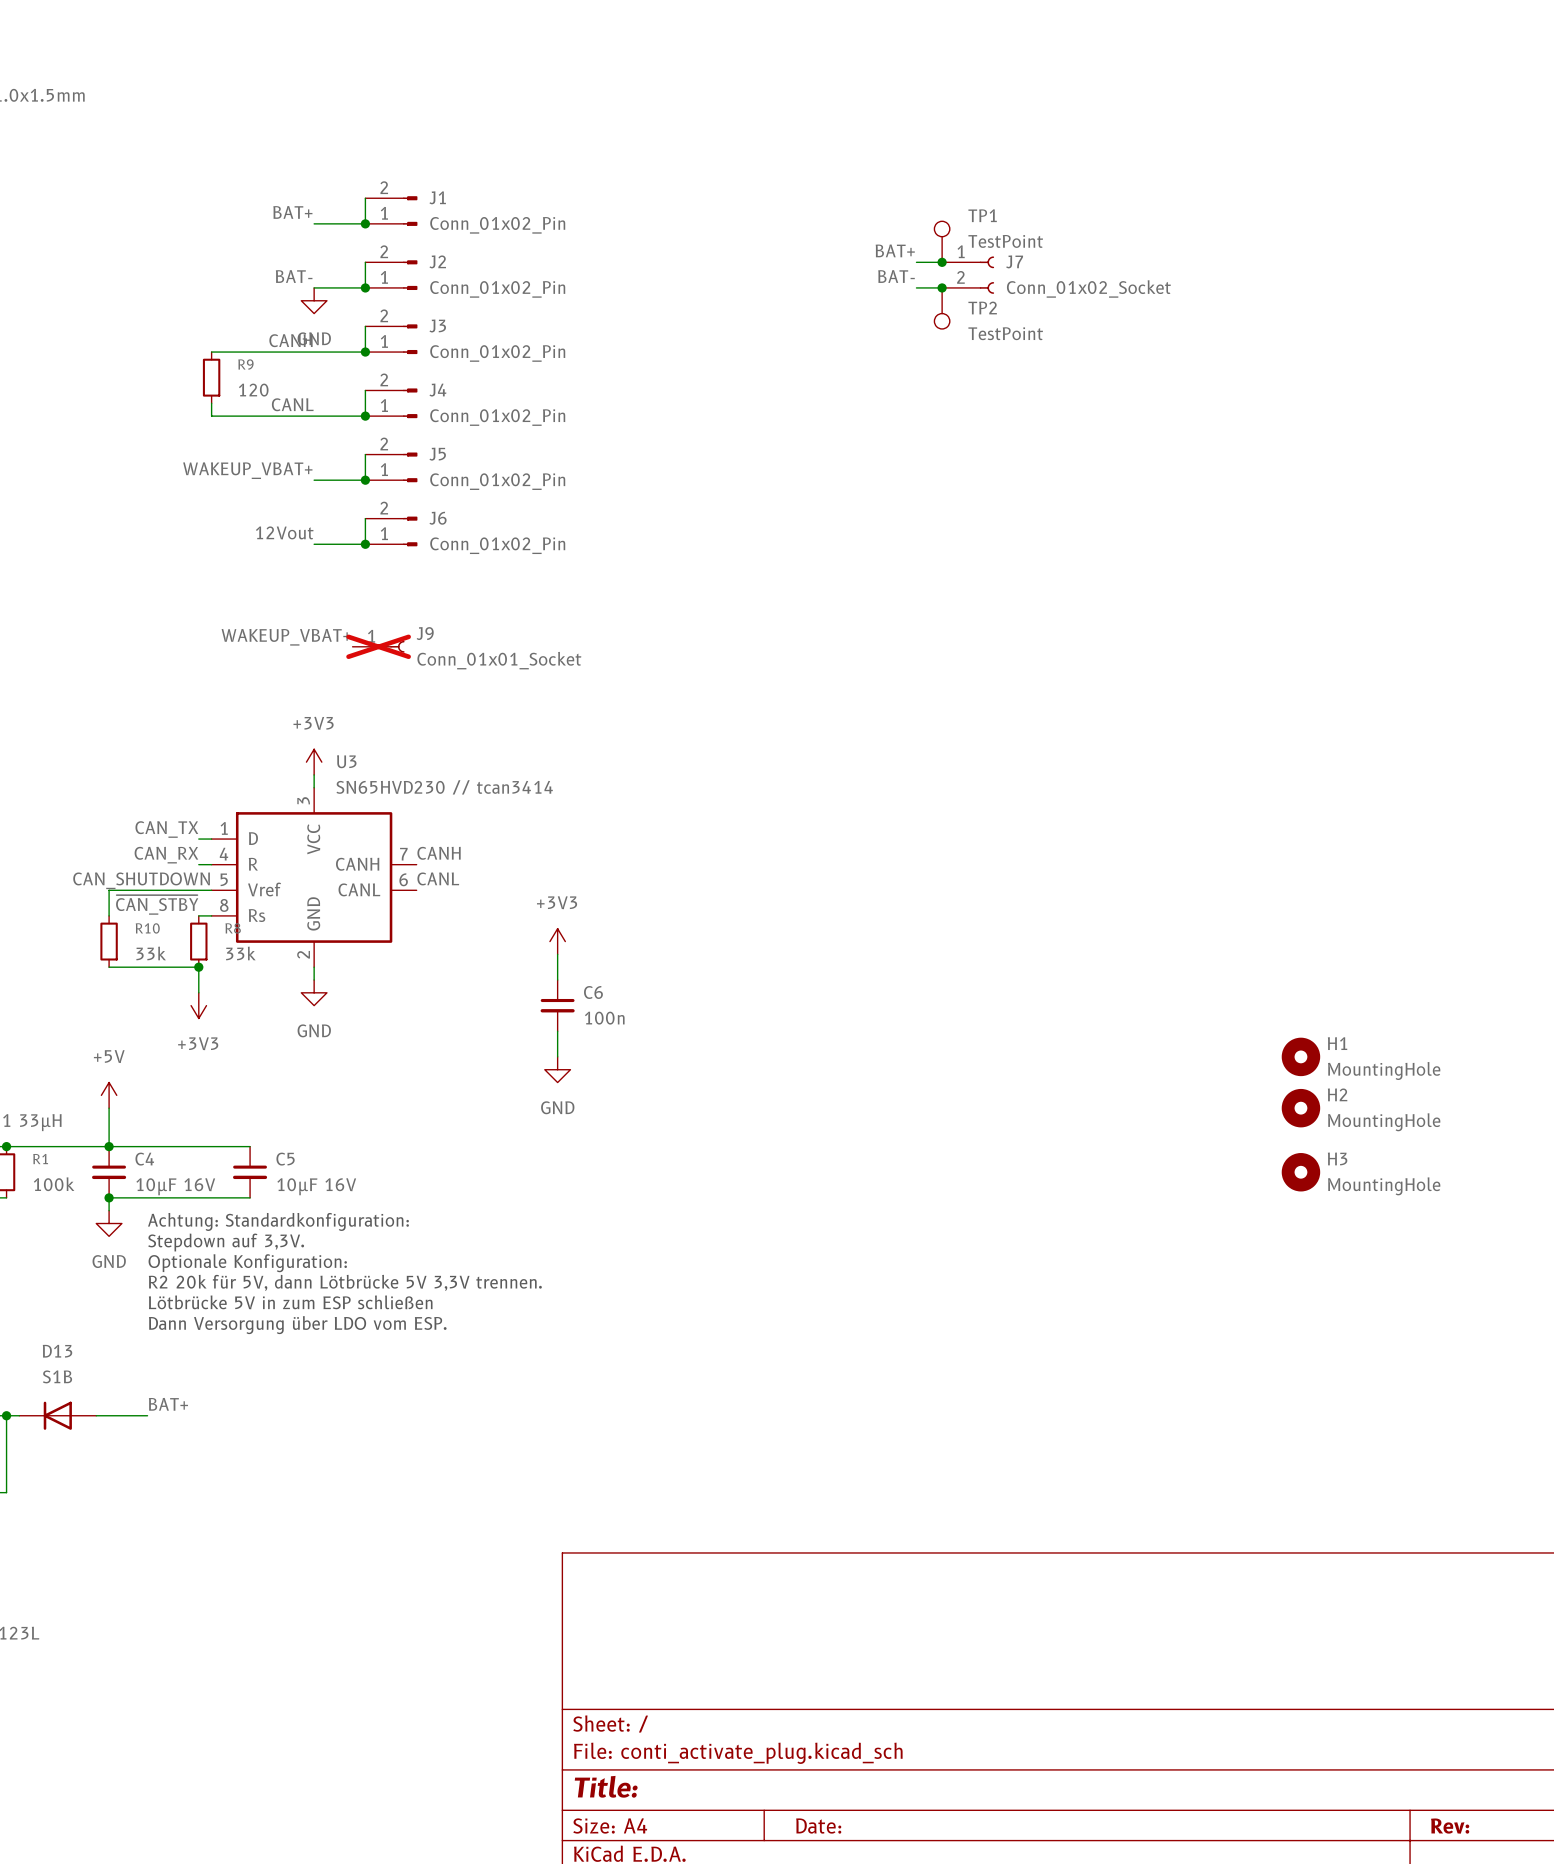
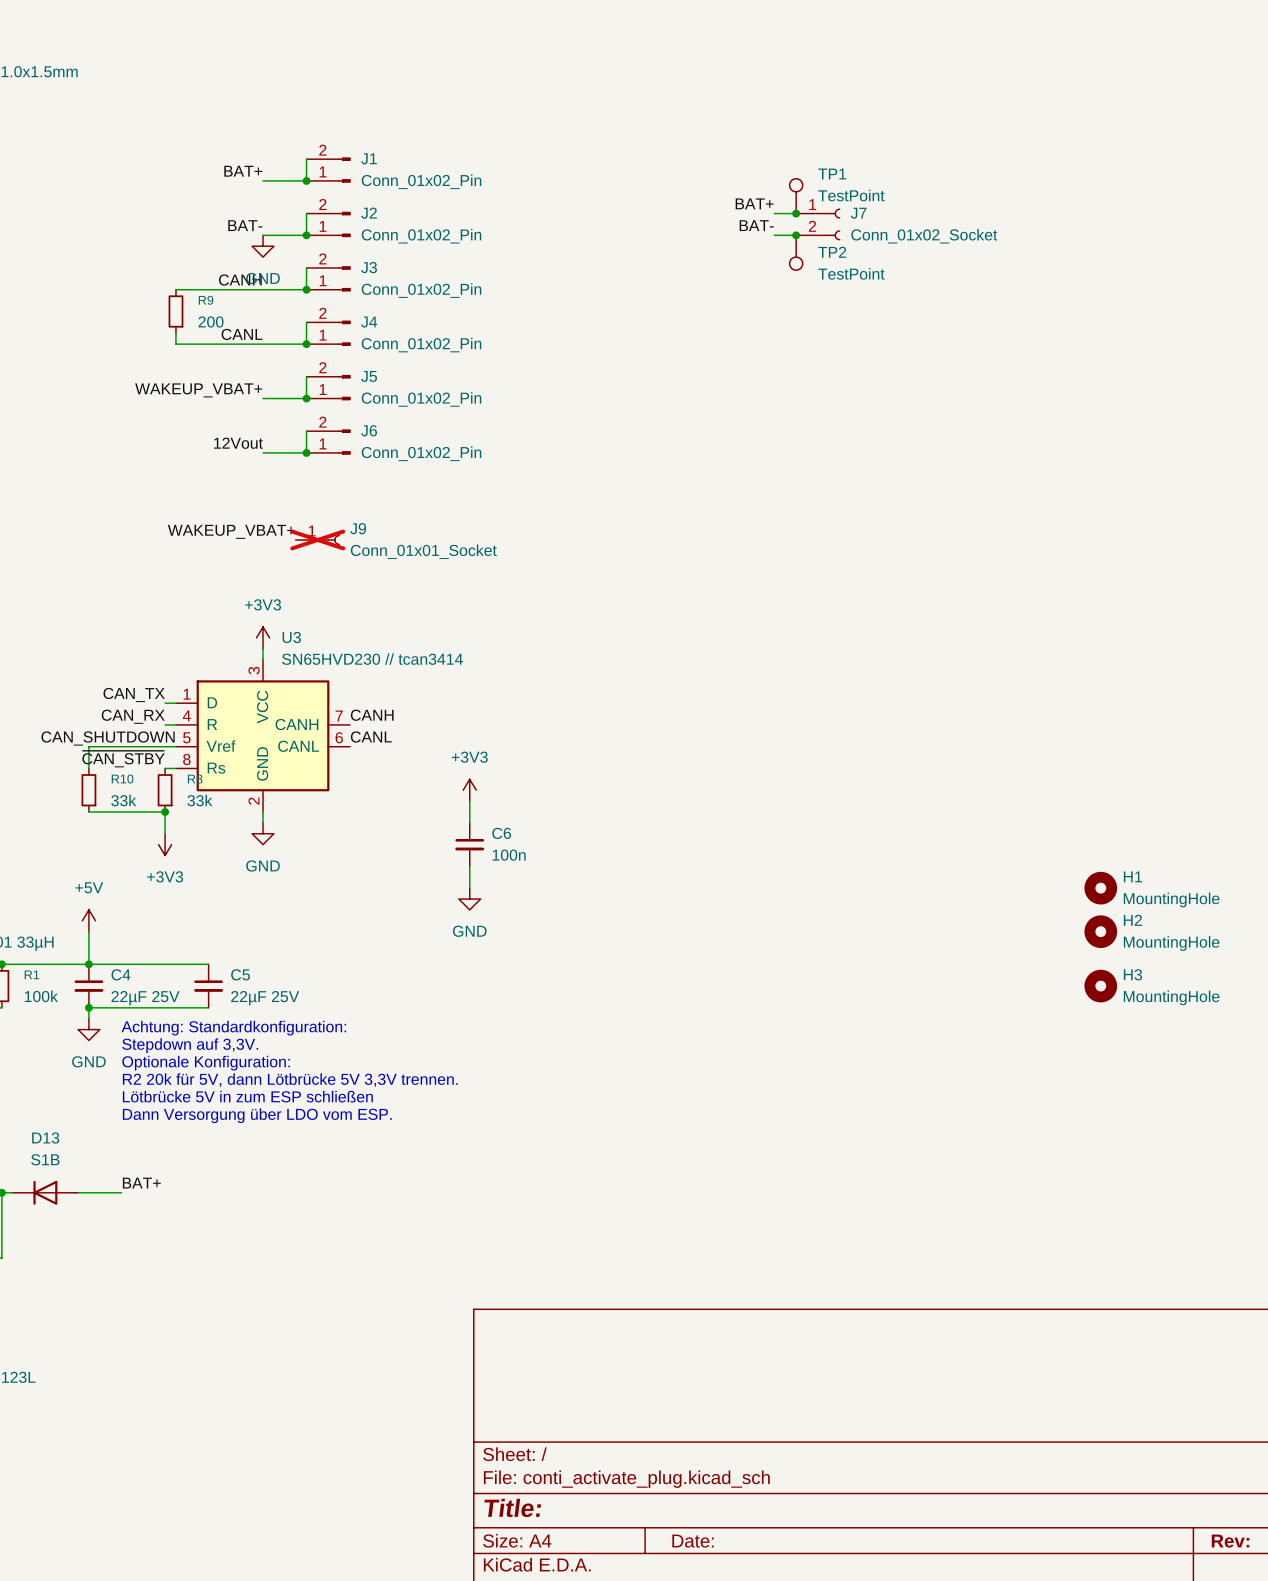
R9 value: 120 (253, 390) -> 200 (211, 321)
C4 value: 10µF 16V (175, 1186) -> 22µF 25V (145, 998)
C5 value: 10µF 16V (316, 1186) -> 22µF 25V (265, 998)

